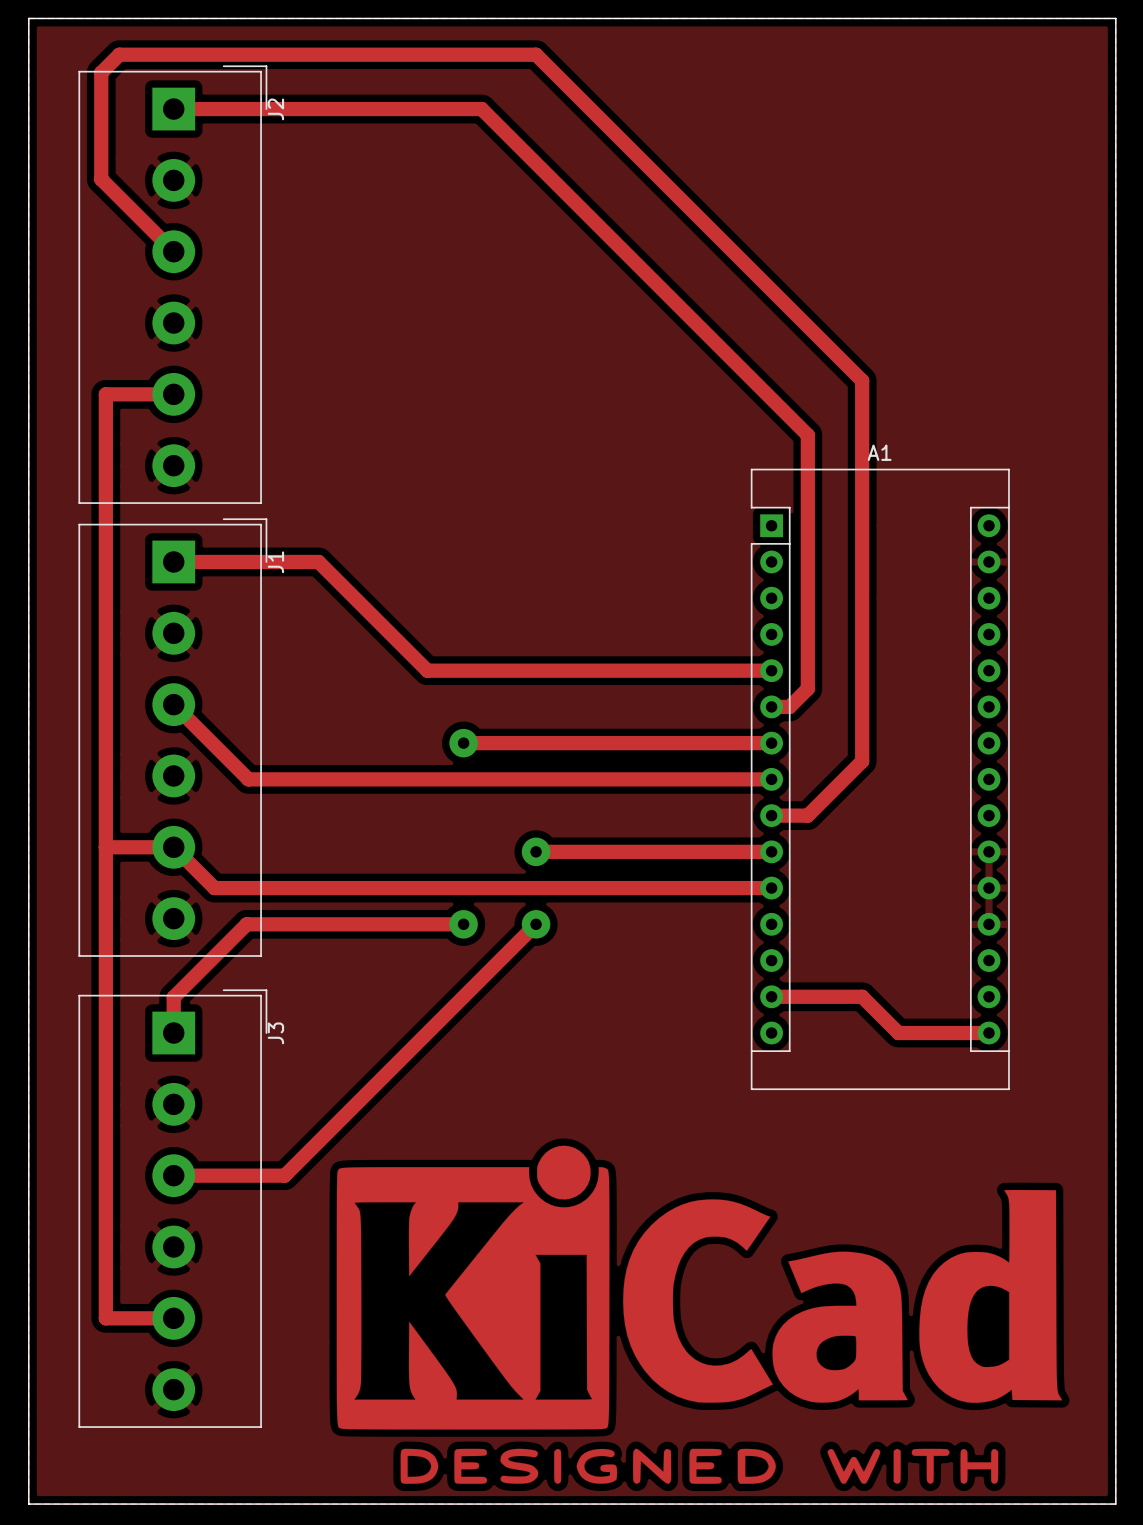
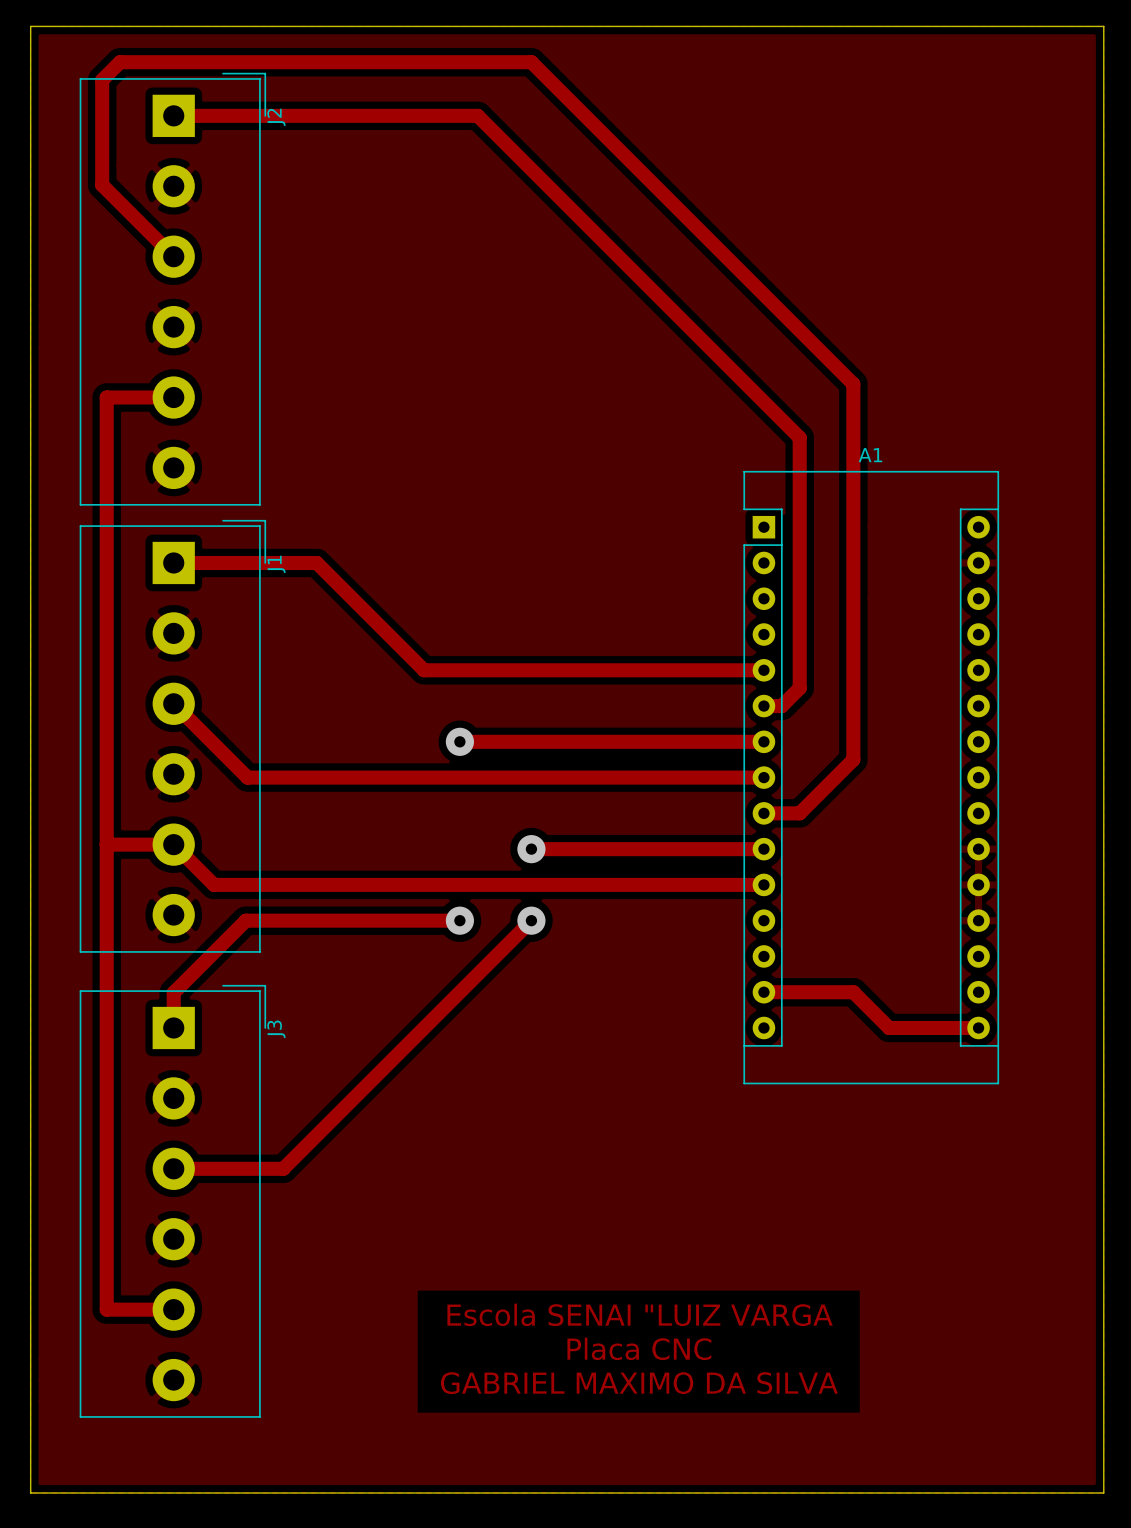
drawing: [336, 1145, 1063, 1484] -> none
text: none -> Escola SENAI "LUIZ VARGA (640, 1314)
text: none -> Placa CNC (639, 1348)
text: none -> GABRIEL MAXIMO DA SILVA (639, 1383)

